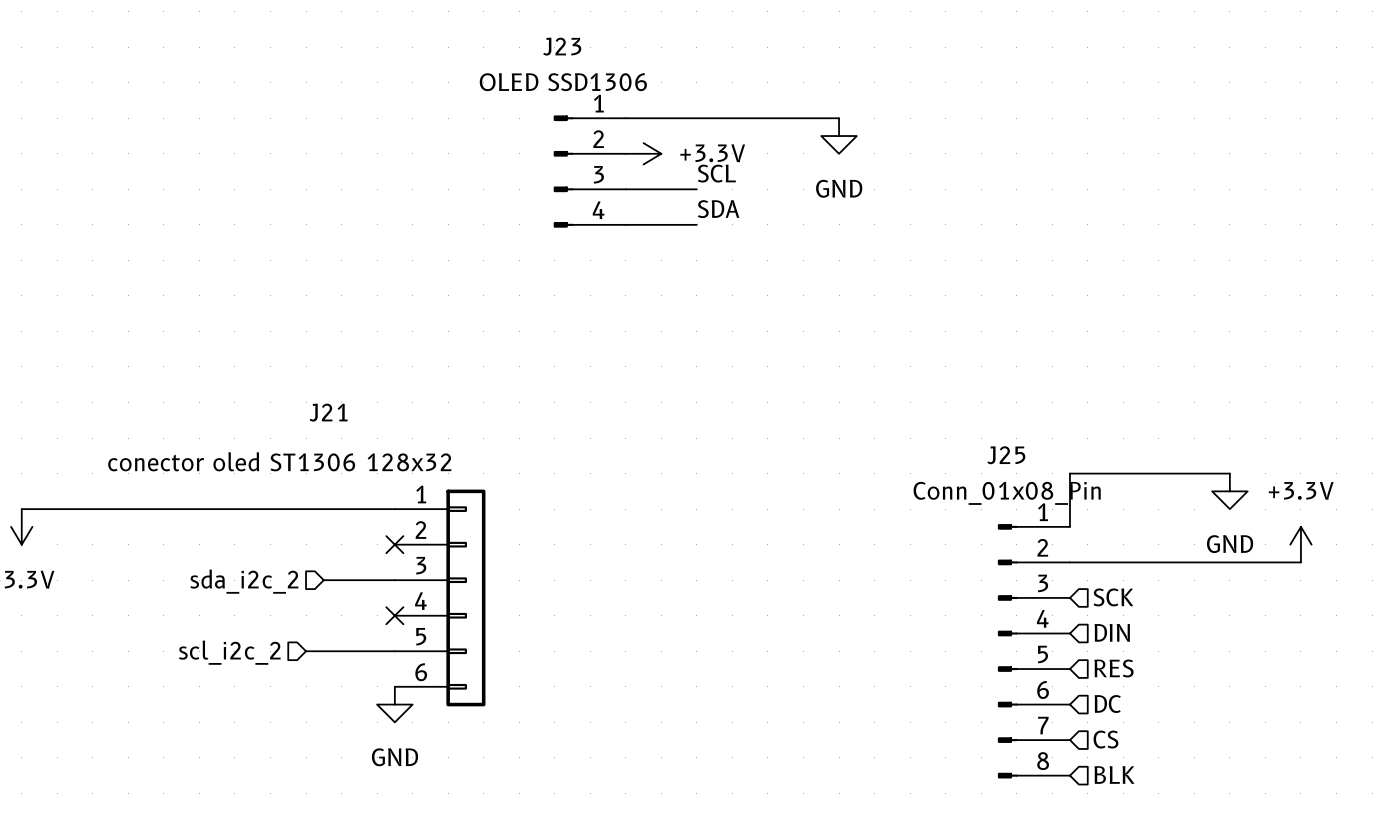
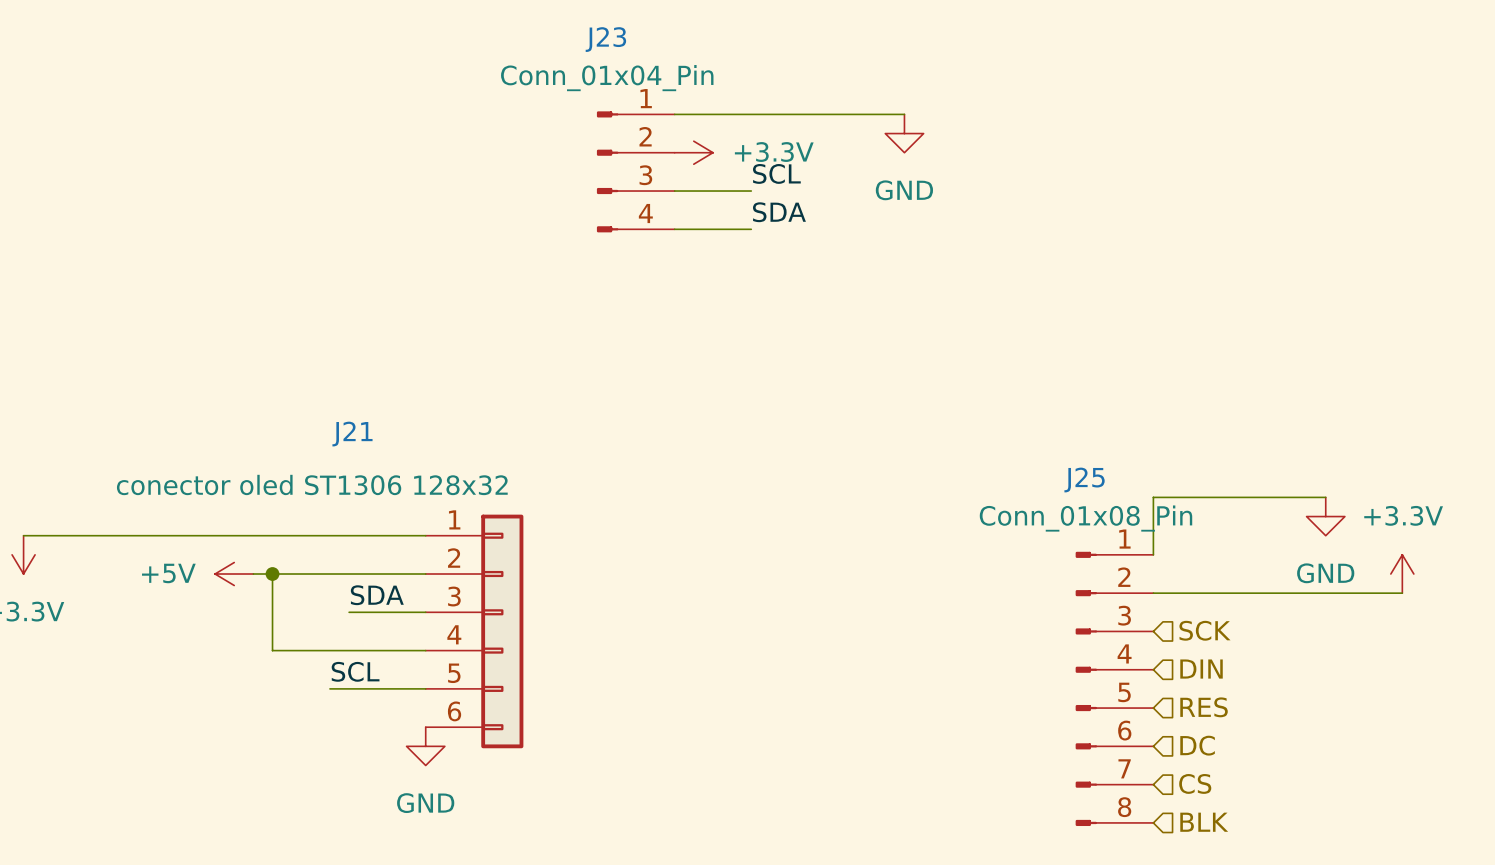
J23 value: OLED SSD1306 (563, 82) -> Conn_01x04_Pin (607, 78)
power symbol: none -> +5V (234, 574)
wire: none -> (253, 574) (425, 574)
wire: none -> (272, 574) (272, 650) (425, 650)
junction: none -> (272, 574)
no-connect mark: (394, 544) -> none
label: none -> SDA (377, 595)
hierarchical label: sda_i2c_2 (244, 581) -> none
no-connect mark: (394, 615) -> none
label: none -> SCL (355, 671)
hierarchical label: scl_i2c_2 (229, 652) -> none

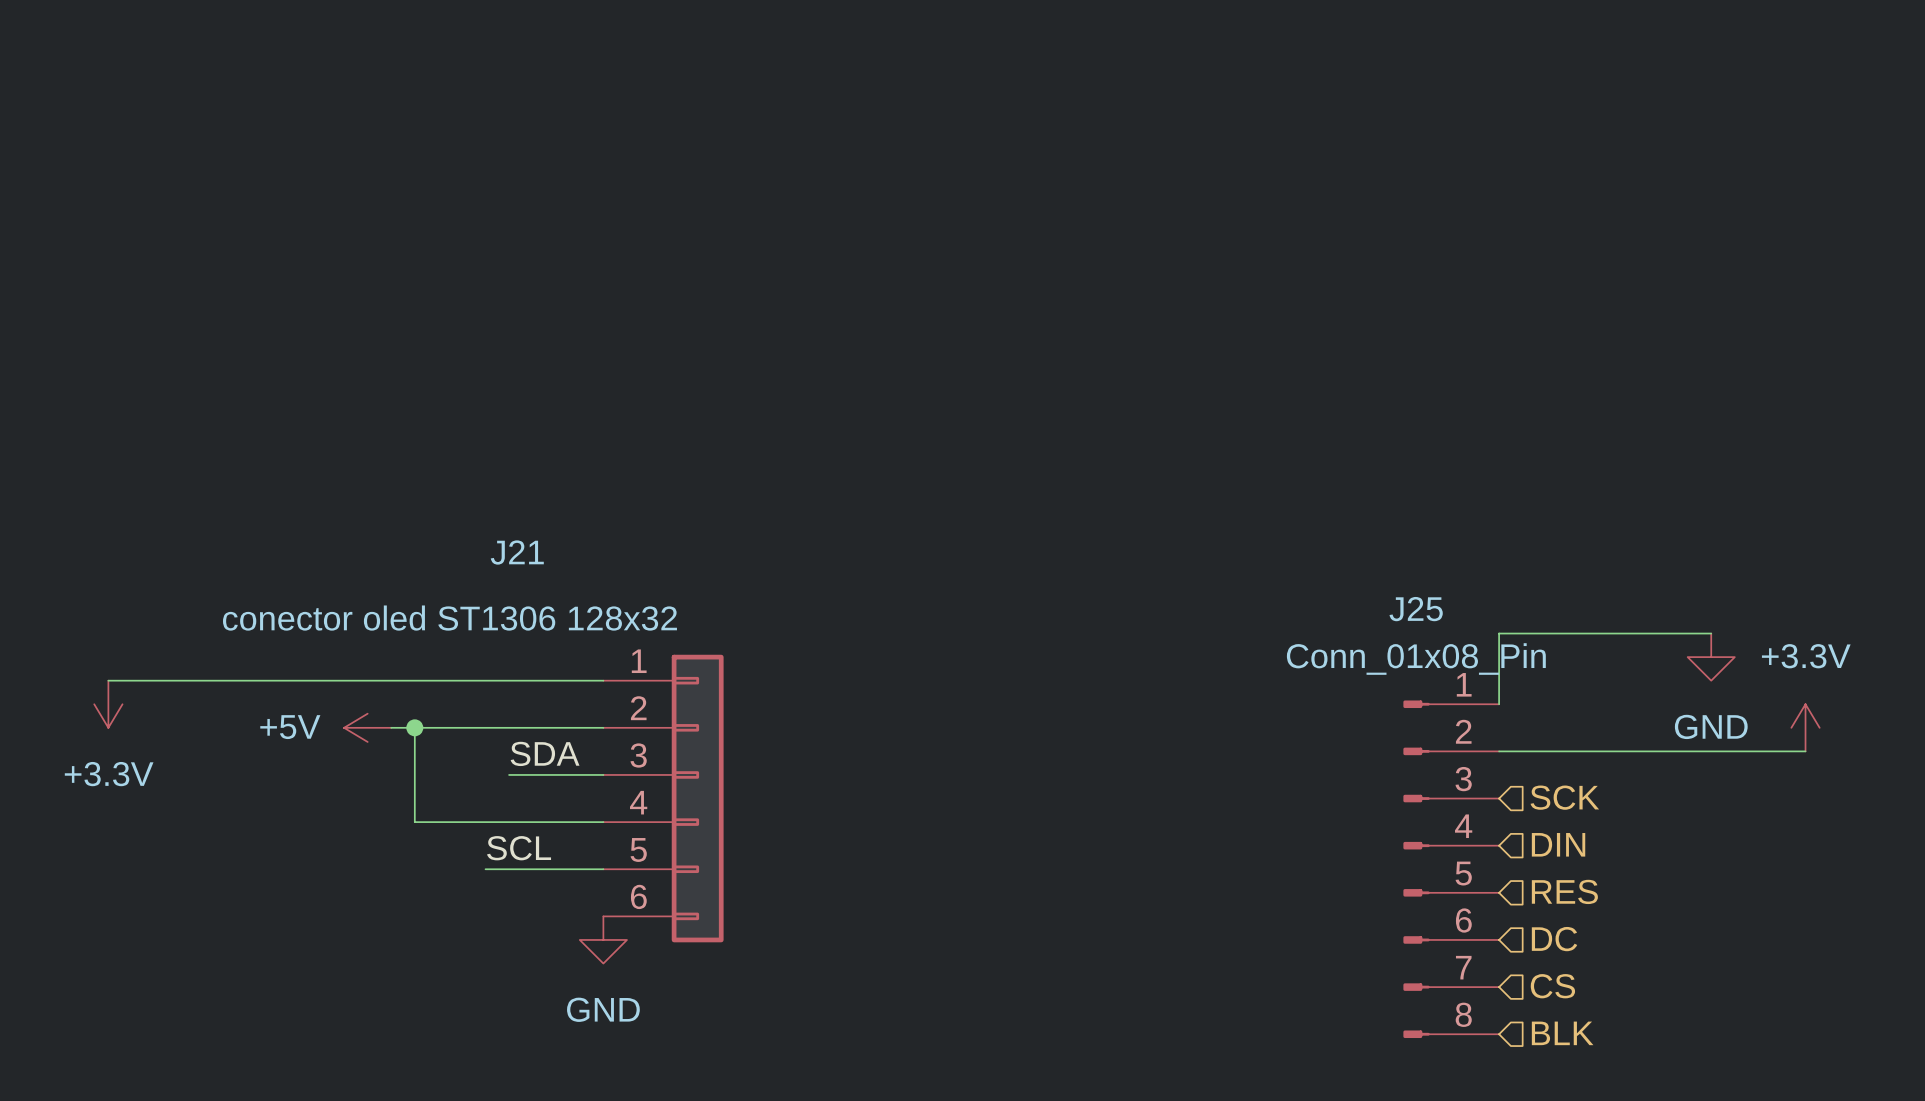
wire: (674, 114) (904, 114) -> none
power symbol: GND (904, 133) -> none
power symbol: +3.3V (693, 152) -> none
J23: Conn_01x04_Pin (635, 171) -> none
label: SCL (776, 173) -> none
wire: (674, 191) (751, 191) -> none
label: SDA (779, 212) -> none
wire: (674, 229) (751, 229) -> none

